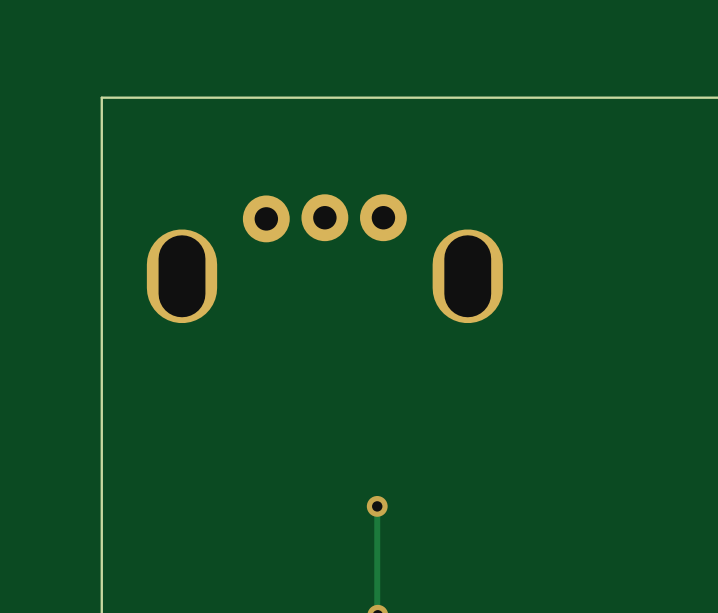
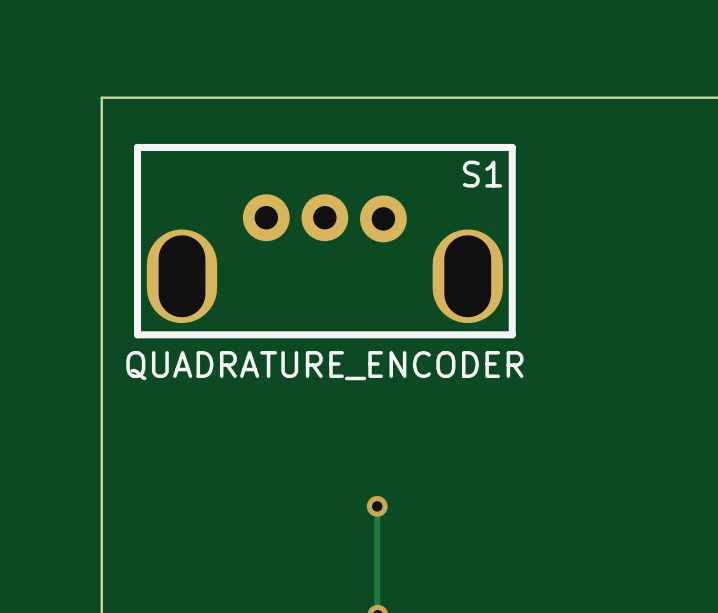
S1 side: top (324, 258) -> bottom (324, 241)

